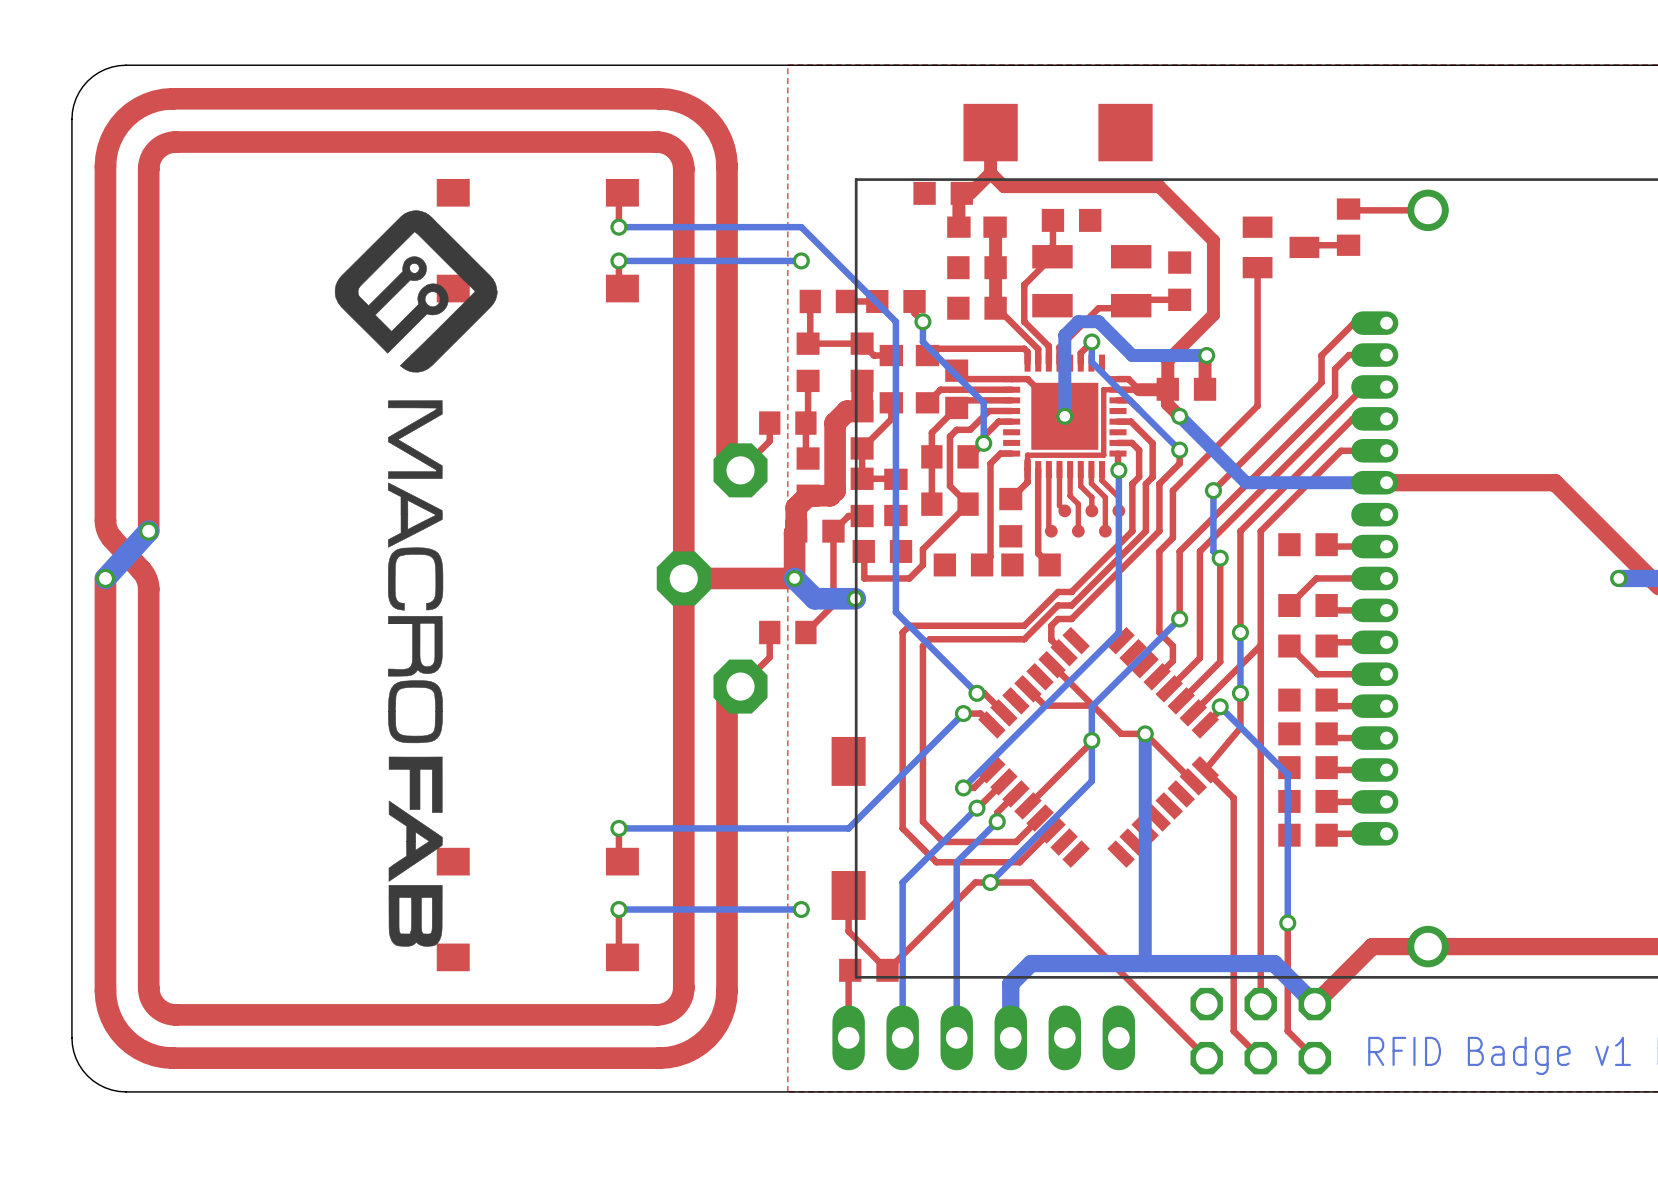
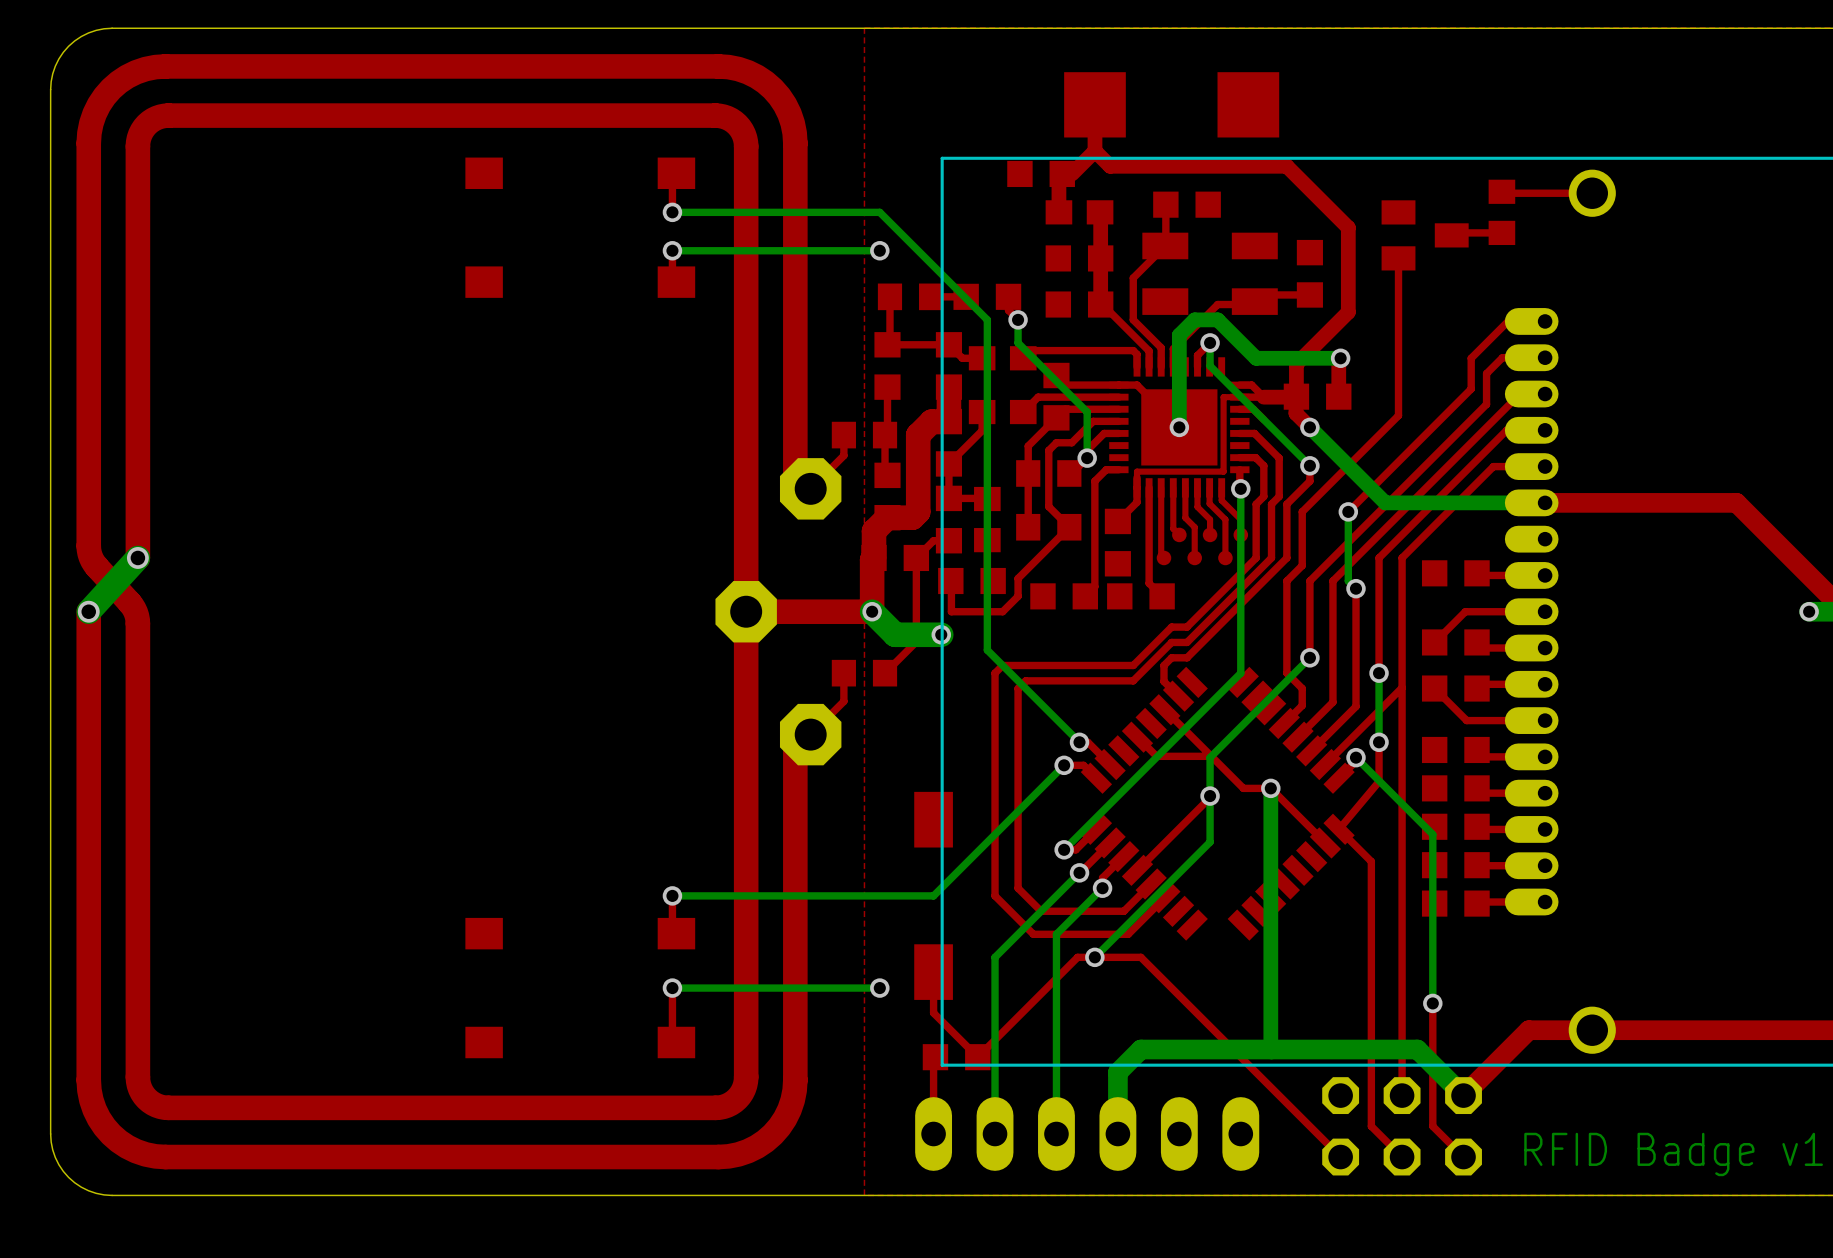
drawing: [334, 210, 498, 947] -> none

